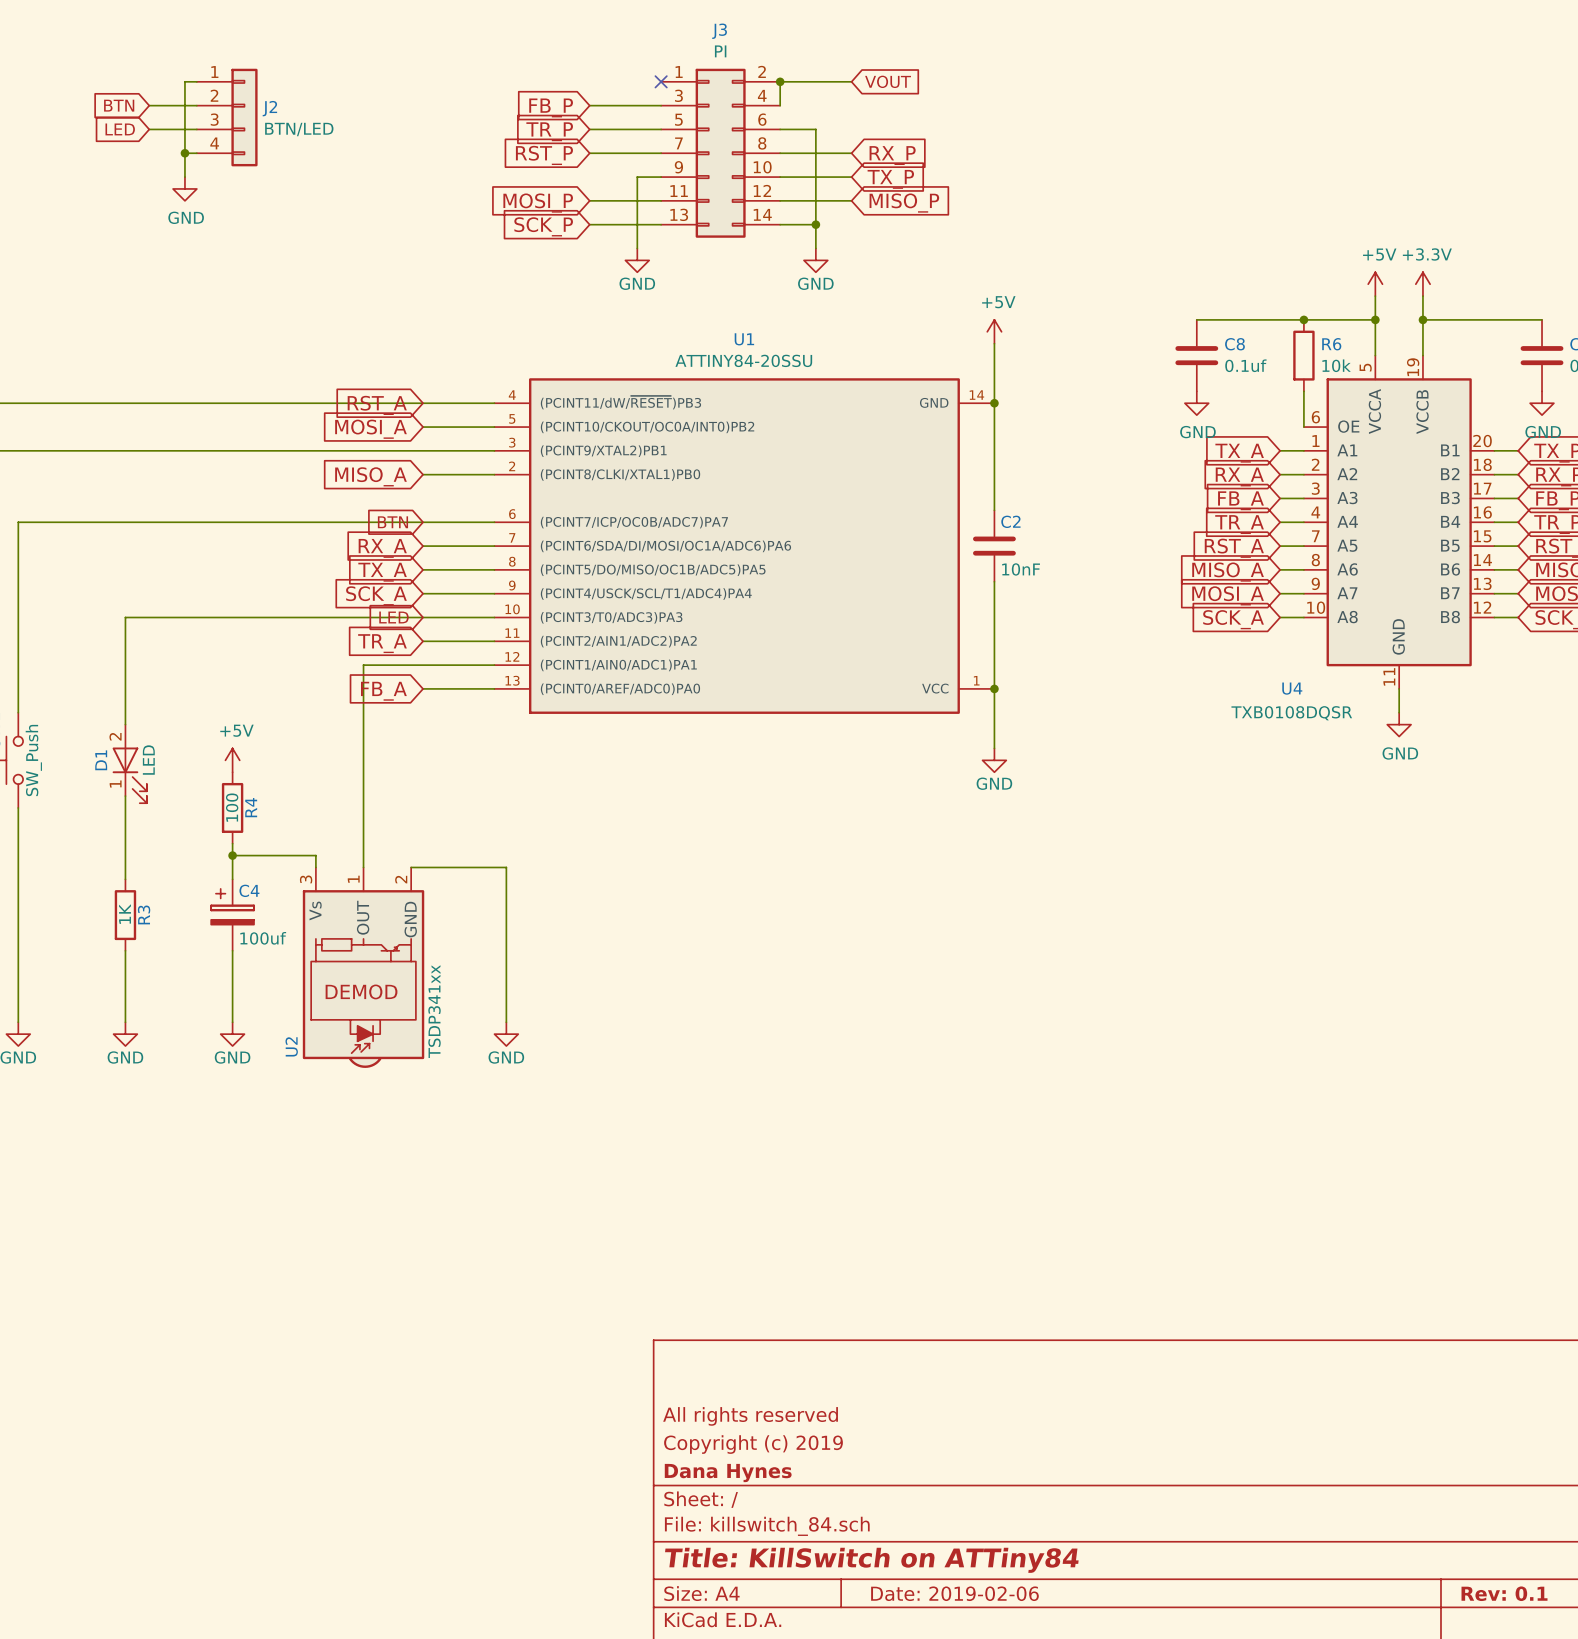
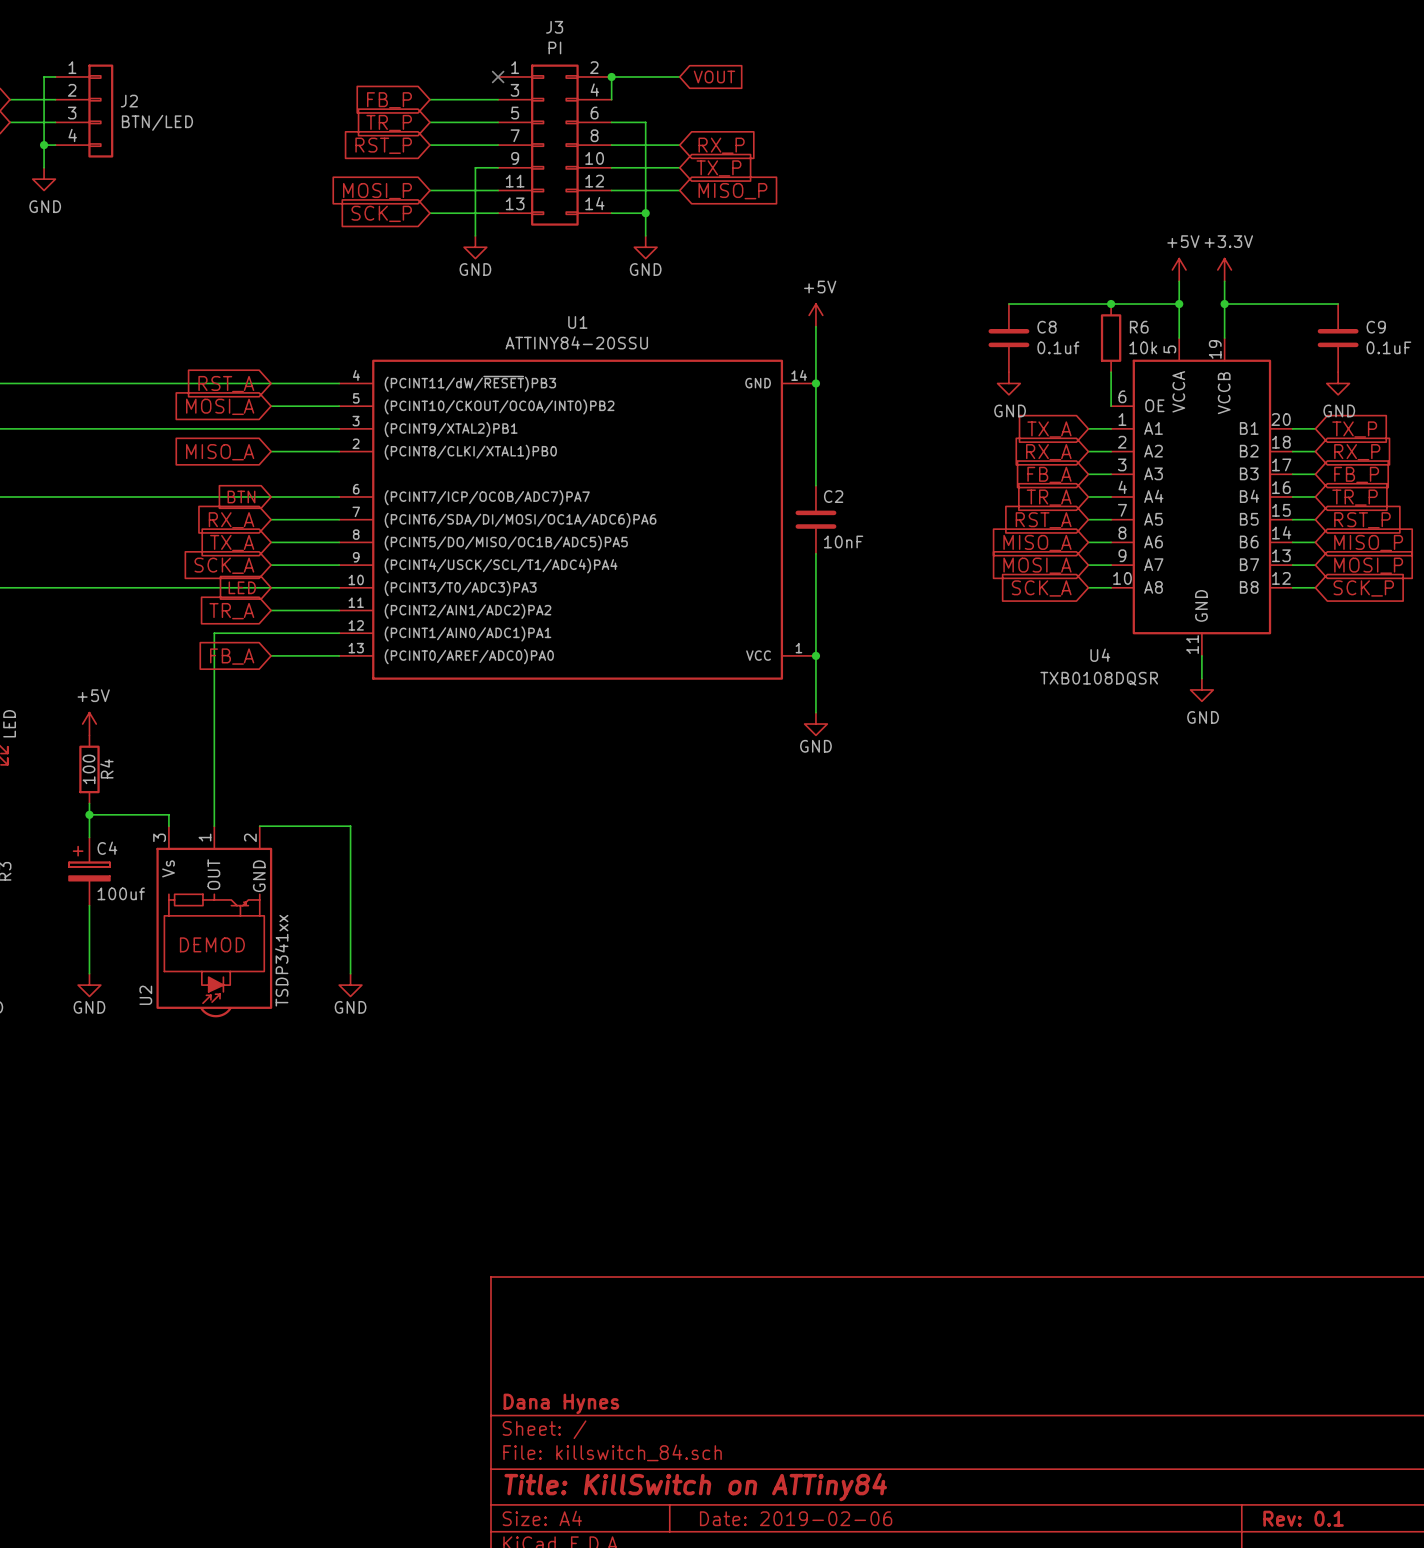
title block: All rights reserved (750, 1416) -> none
title block: Copyright (c) 2019 (753, 1444) -> none

